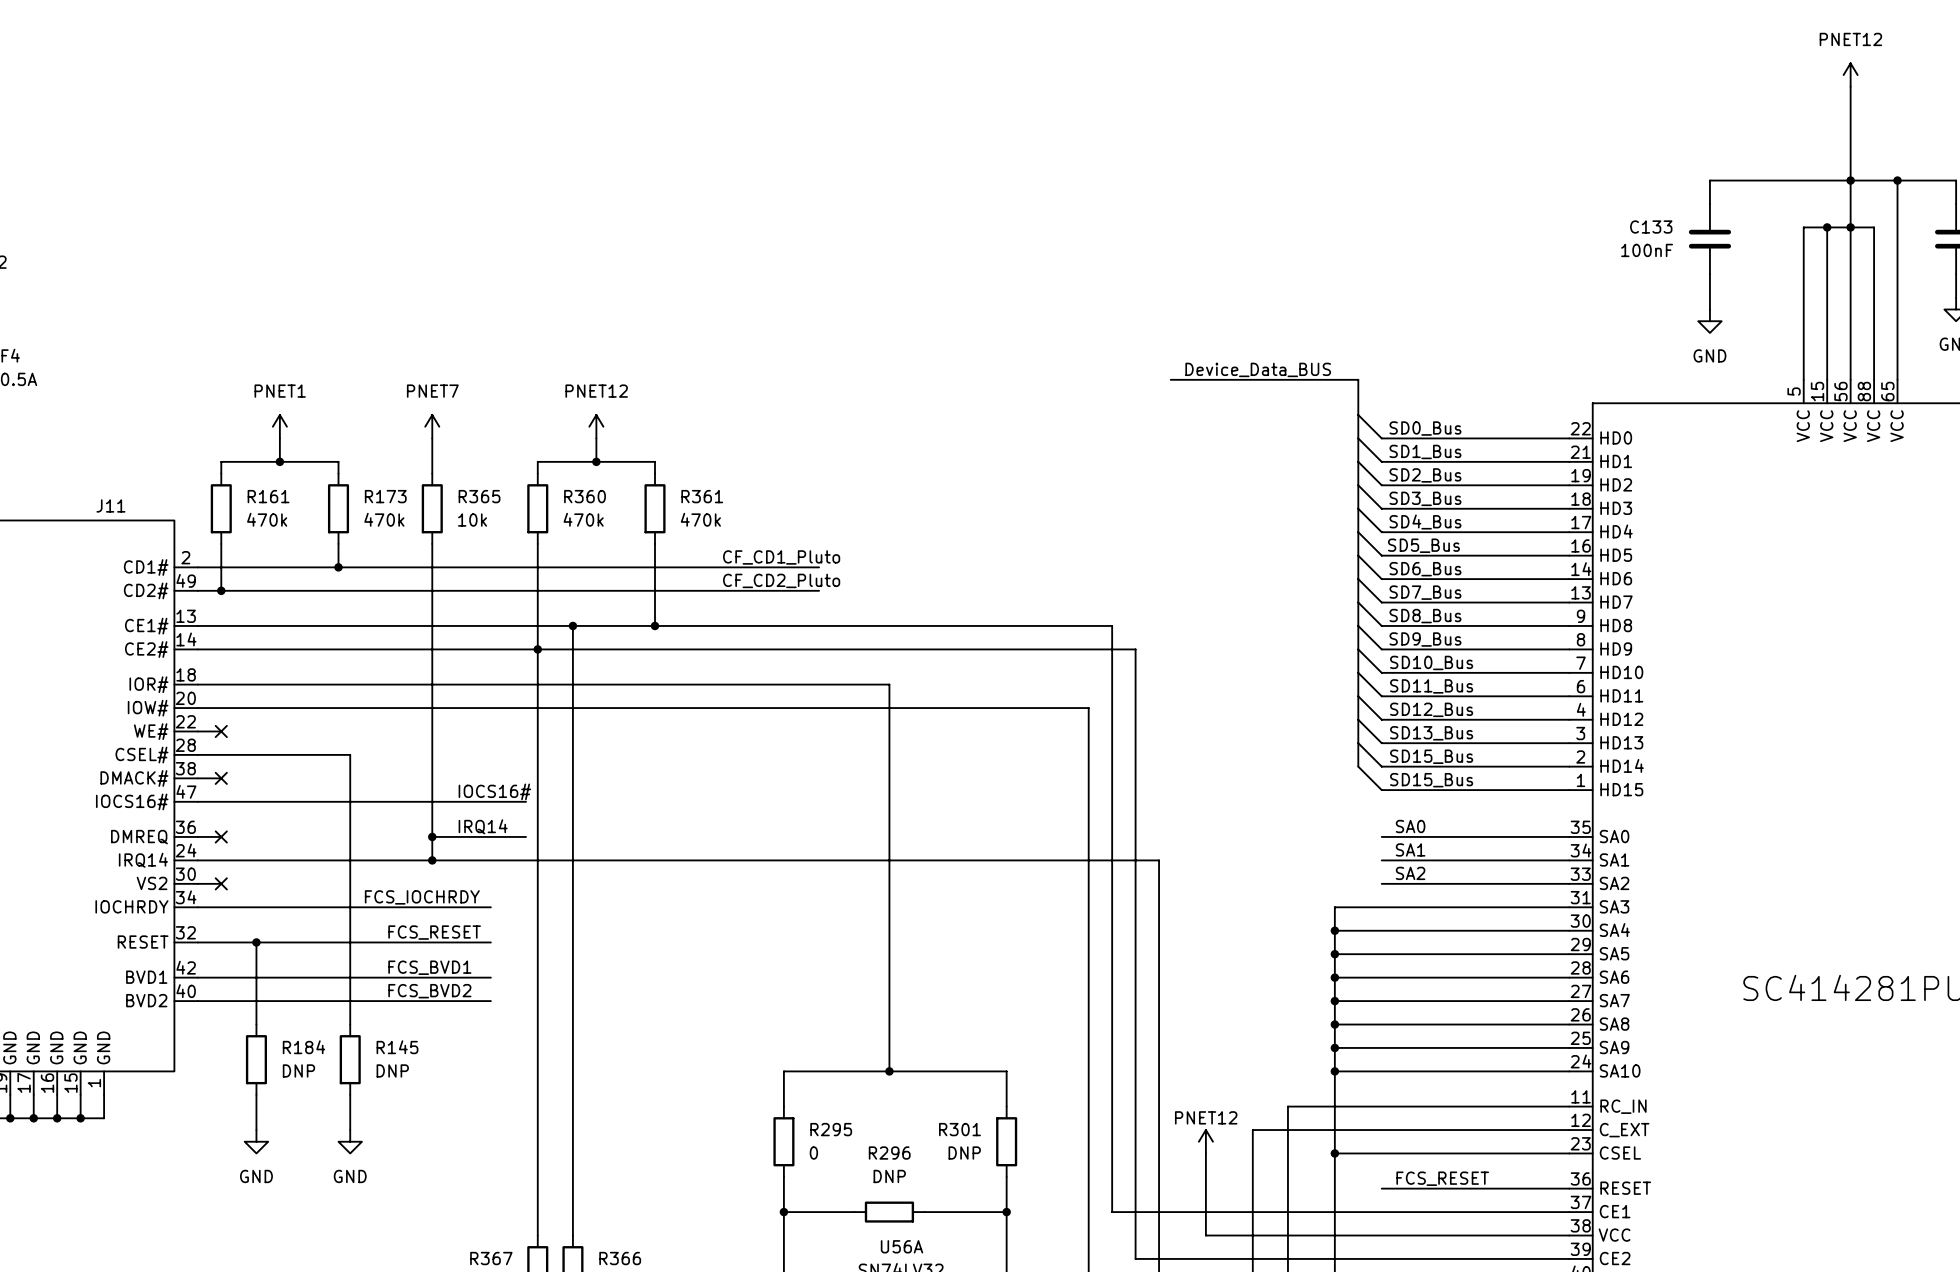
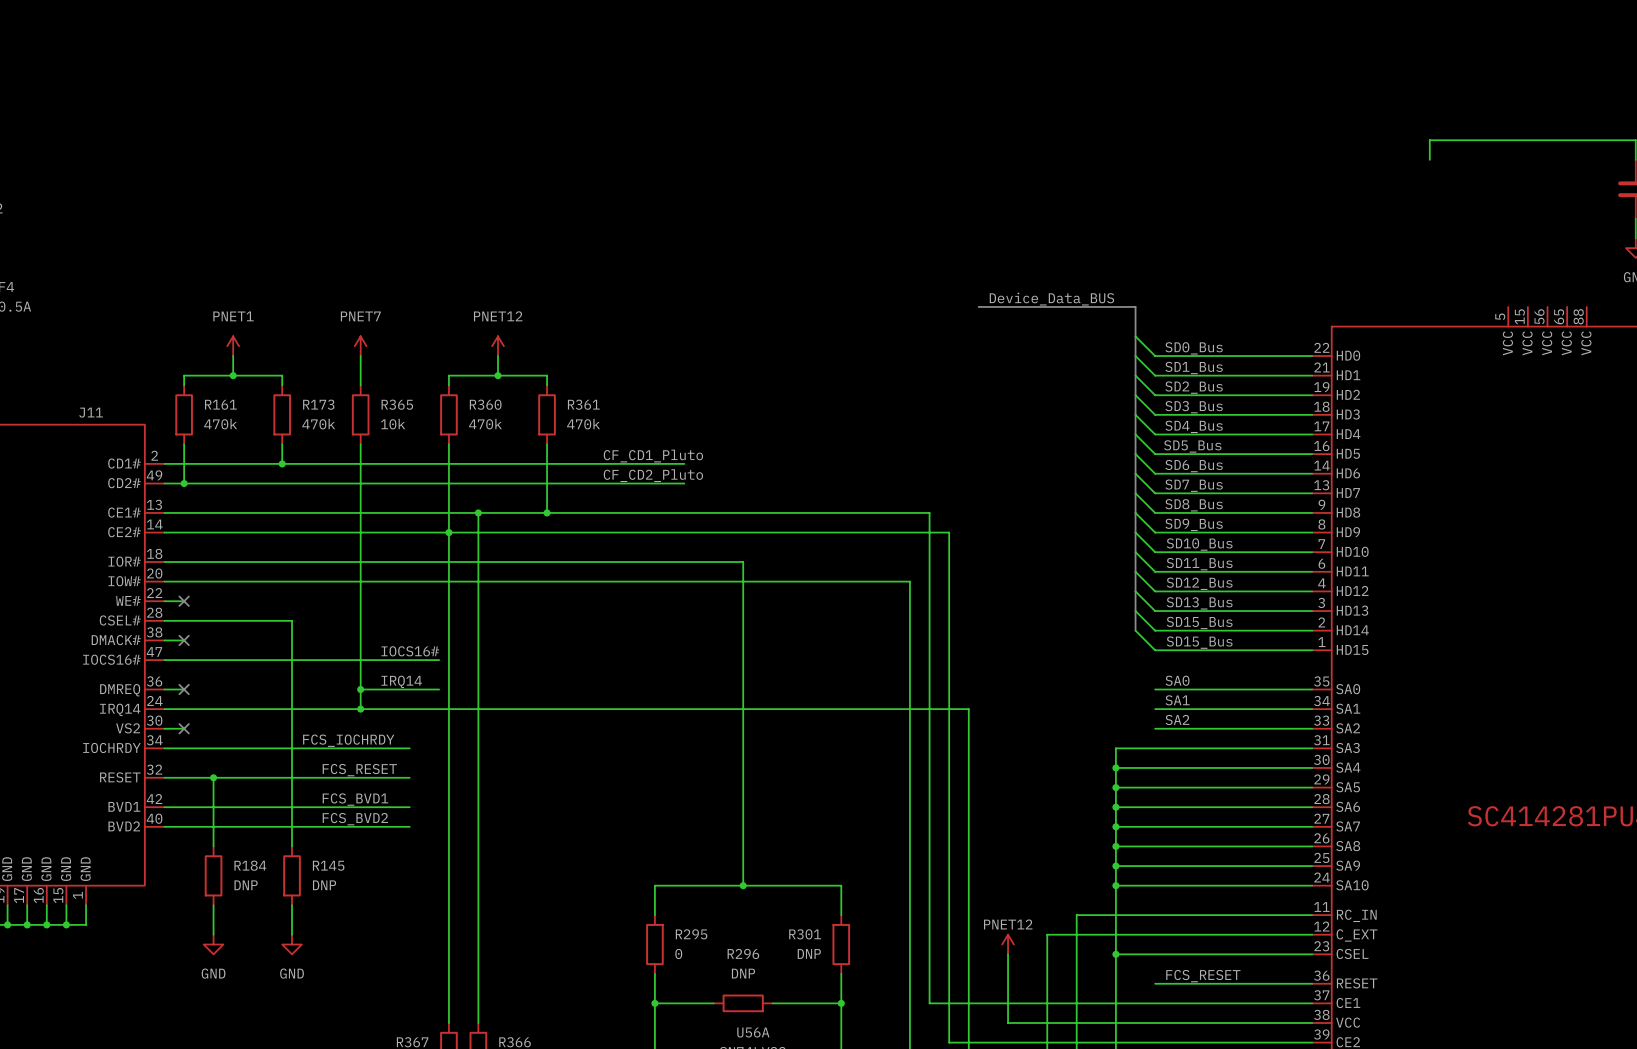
power symbol: PNET12 (1850, 75) -> none
wire: (1850, 86) (1850, 379) -> none
junction: (1850, 180) -> none
wire: (1897, 180) (1897, 379) -> none
junction: (1897, 180) -> none
wire: (1827, 227) (1827, 379) -> none
junction: (1827, 227) -> none
junction: (1850, 227) -> none
C133: 100nF (1709, 239) -> none
wire: (1709, 274) (1709, 309) -> none
power symbol: GND (1709, 321) -> none
wire: (1803, 379) (1803, 227) (1874, 227) (1874, 379) -> none
part pin number: 88 (1864, 391) -> 65 (1559, 316)
part pin number: 65 (1887, 391) -> 88 (1578, 316)

